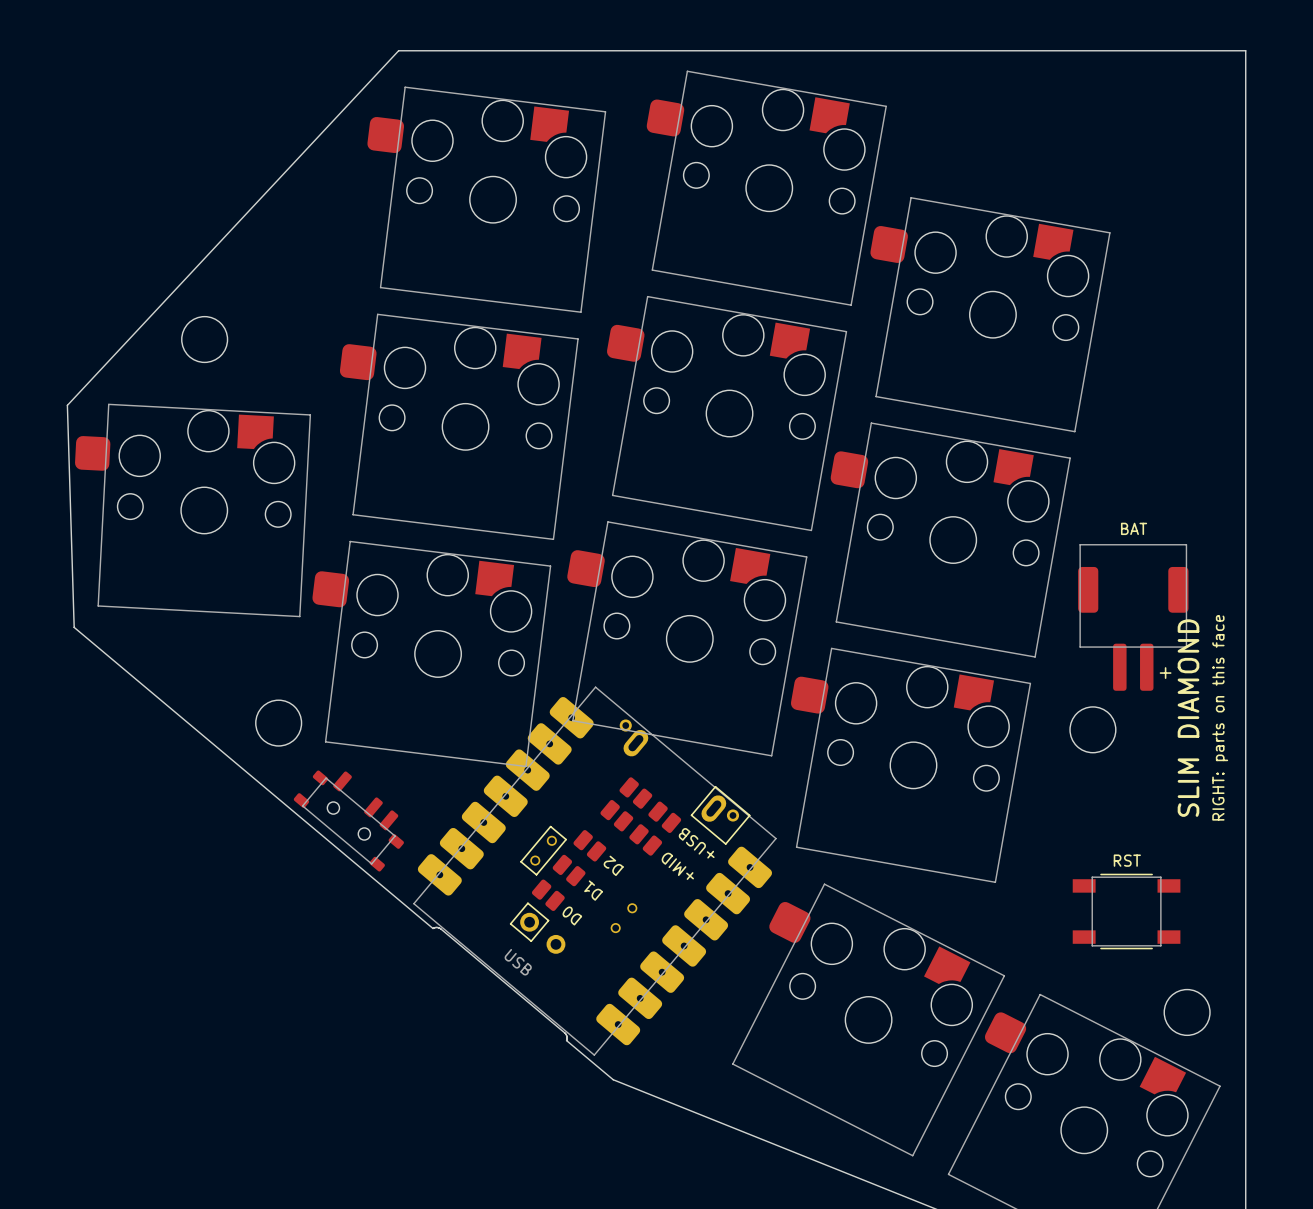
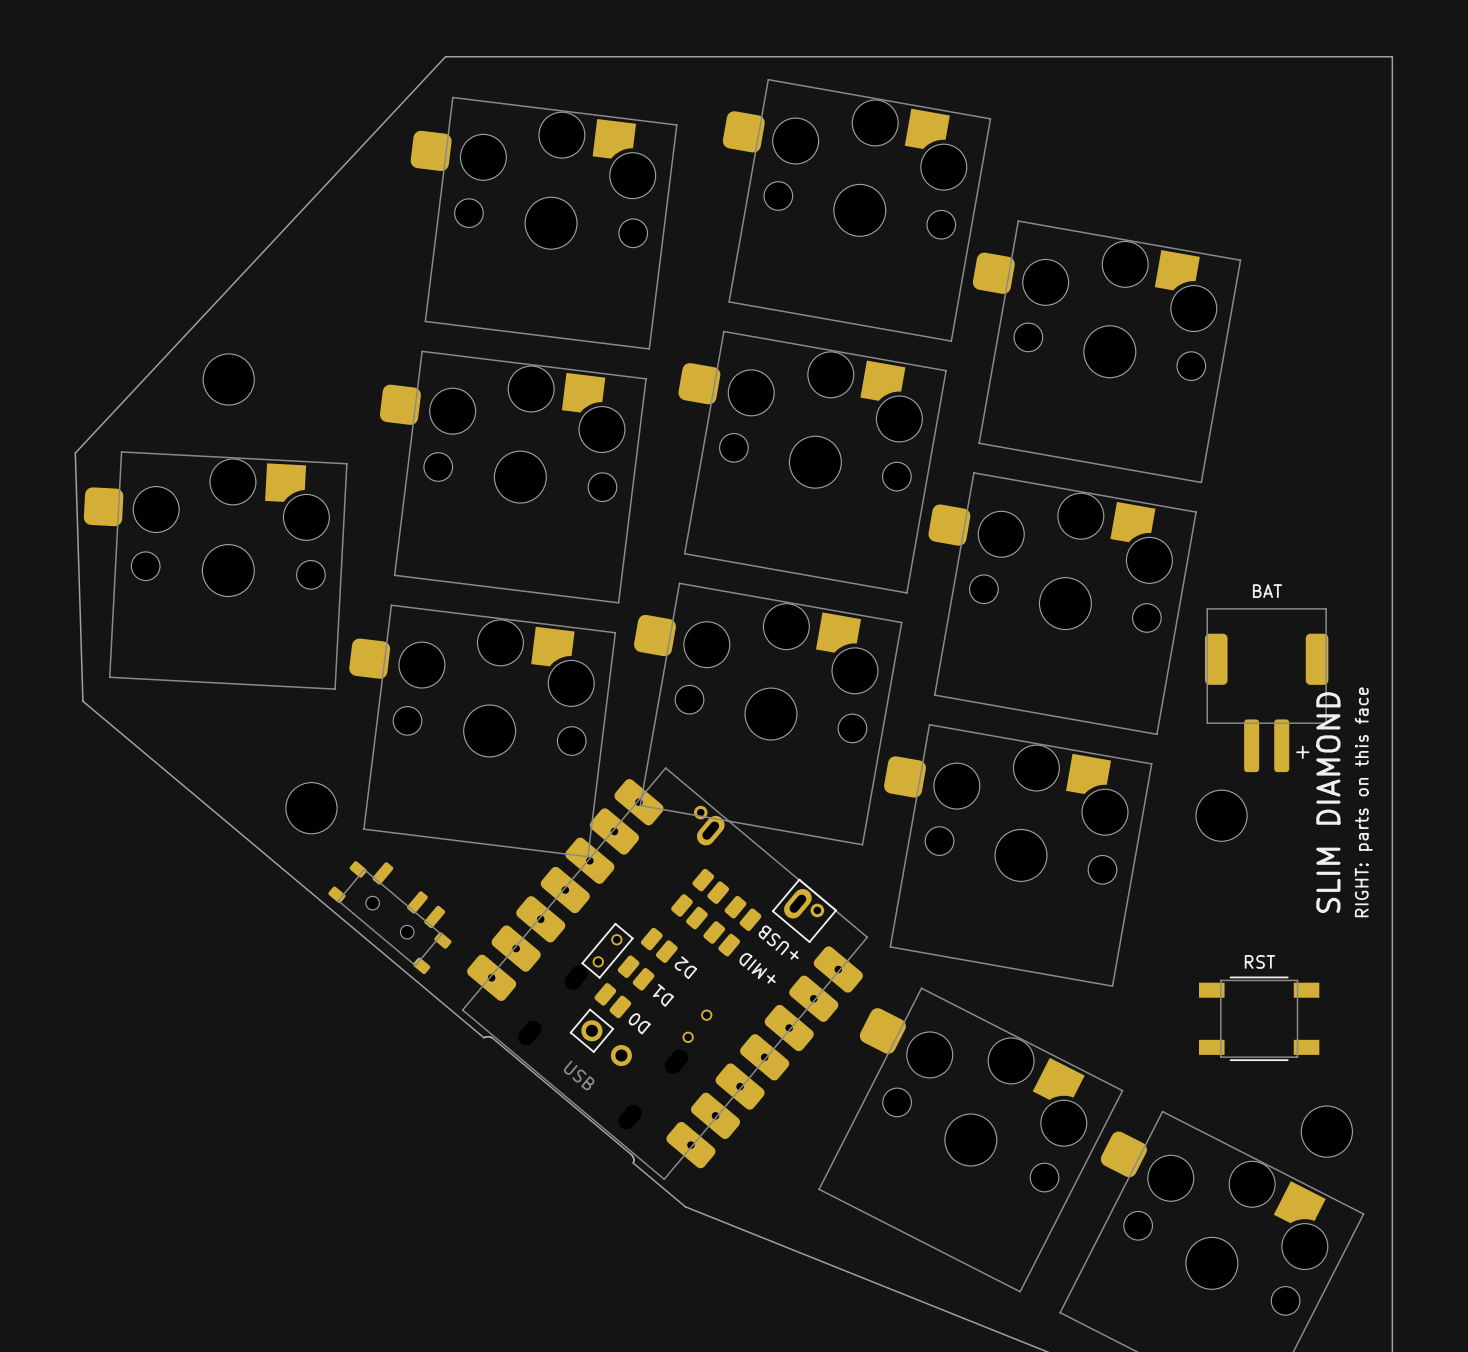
part footprint: [413, 686, 777, 1056] -> [461, 767, 869, 1181]

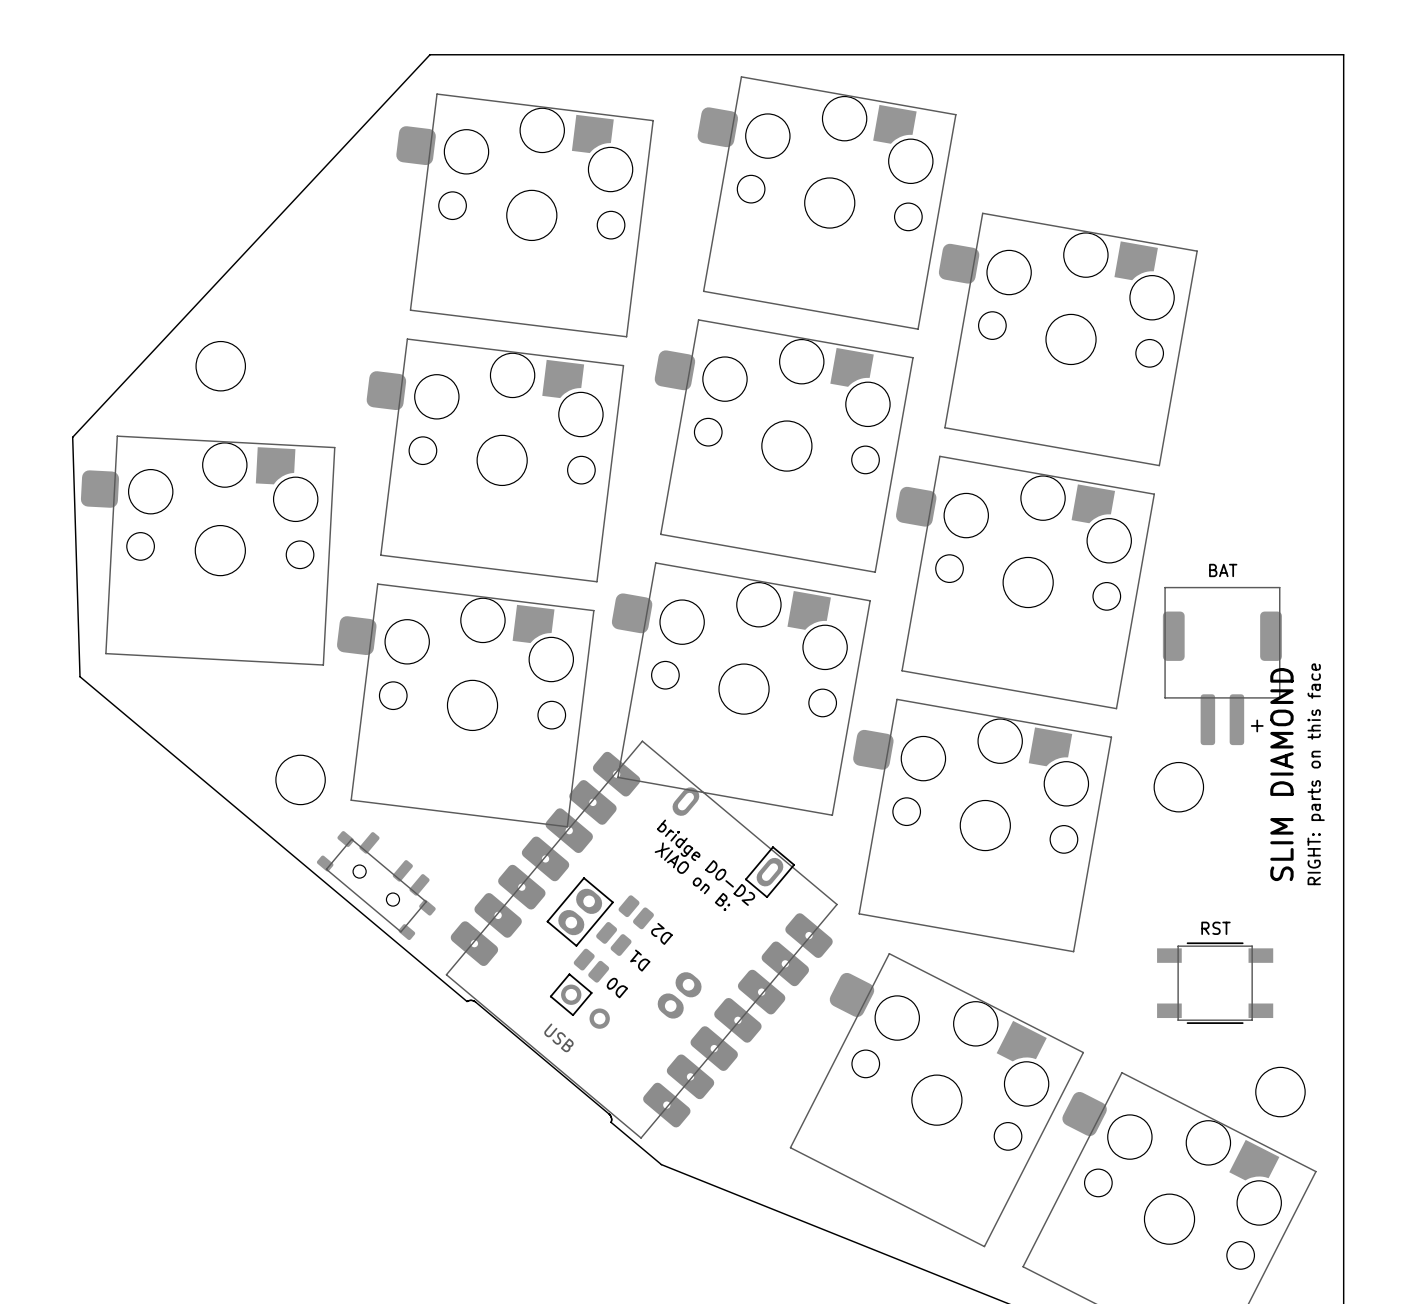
part footprint: [461, 767, 869, 1181] -> [445, 740, 838, 1139]
part: (710, 886) -> none
part: (689, 911) -> none
part: (742, 913) -> none
part: (721, 938) -> none
text: +USB (778, 942) -> none
text: +MID (757, 968) -> none

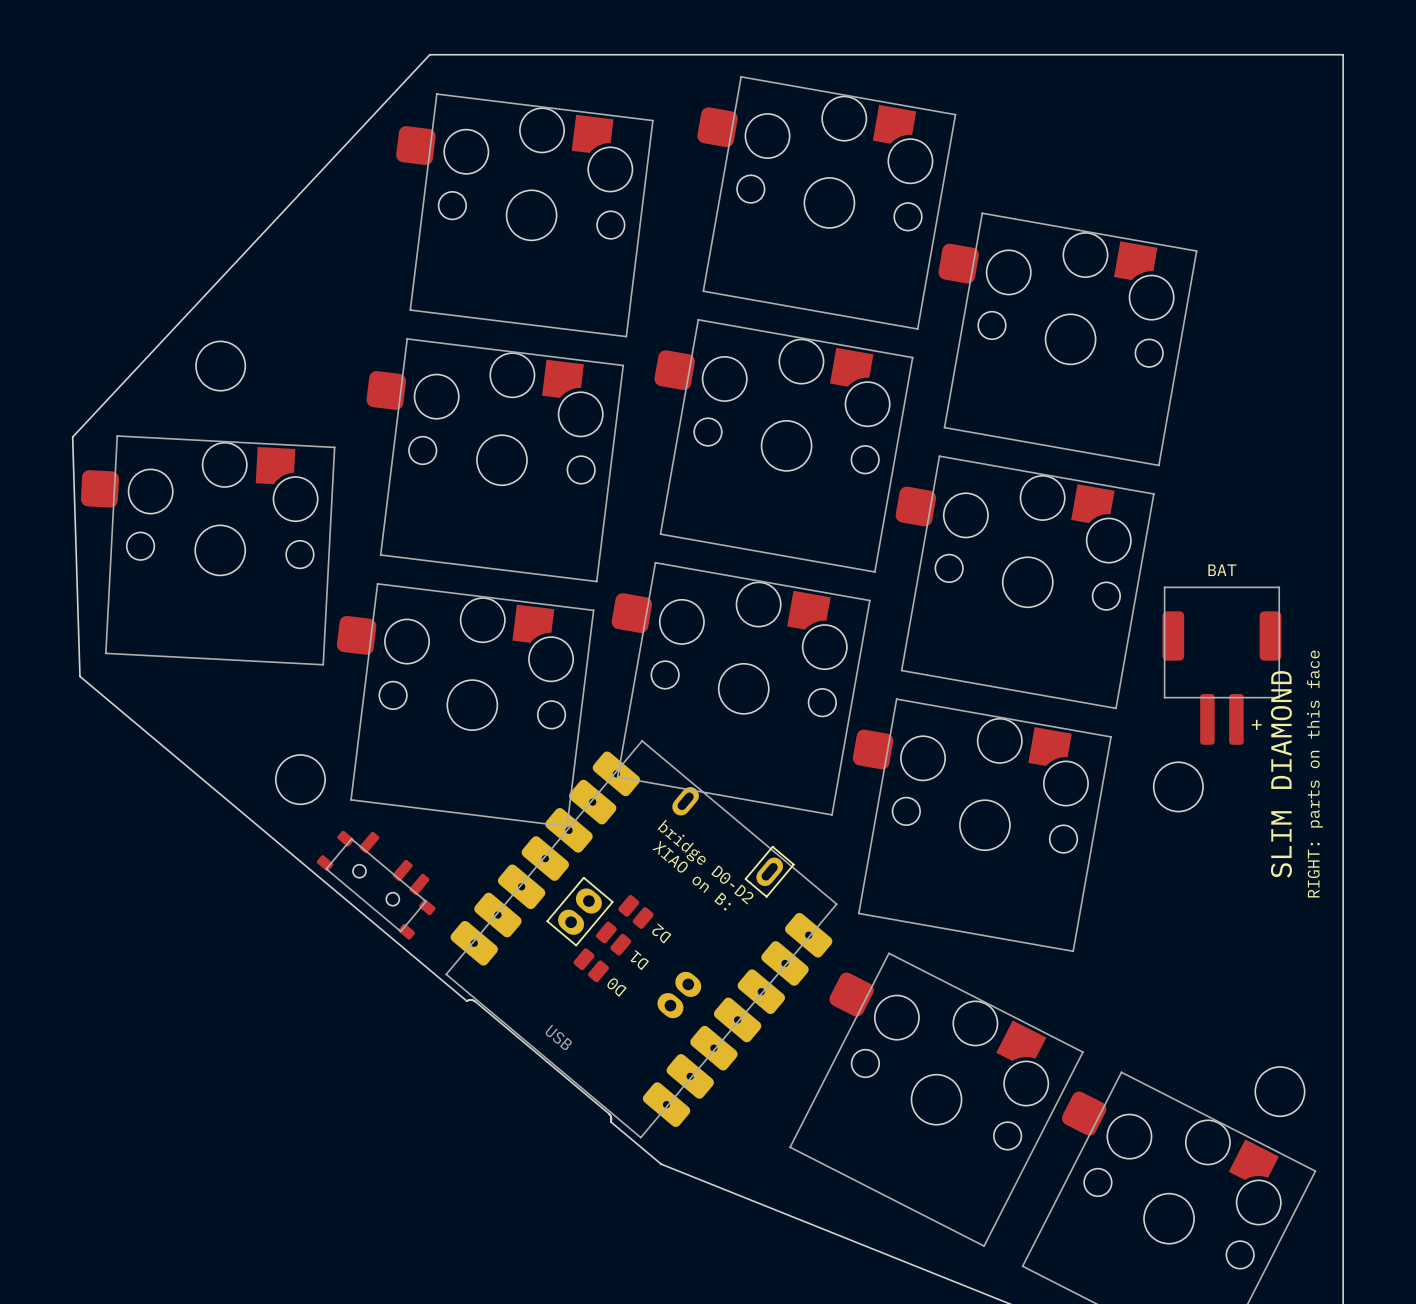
part footprint: [445, 740, 838, 1139] -> [445, 740, 838, 1139]
part: (1215, 983) -> none

